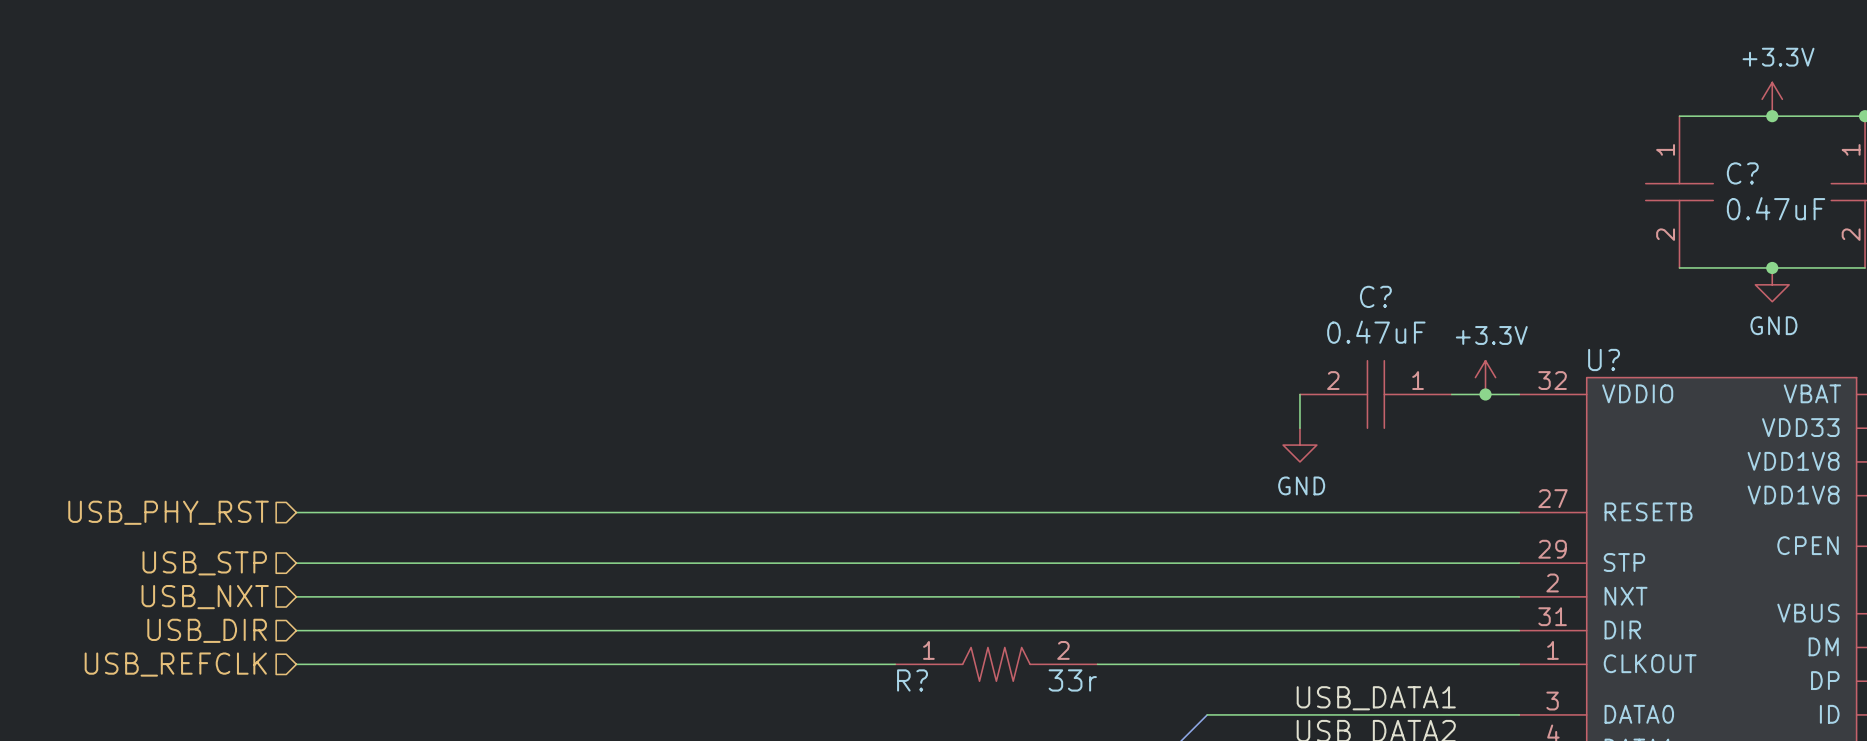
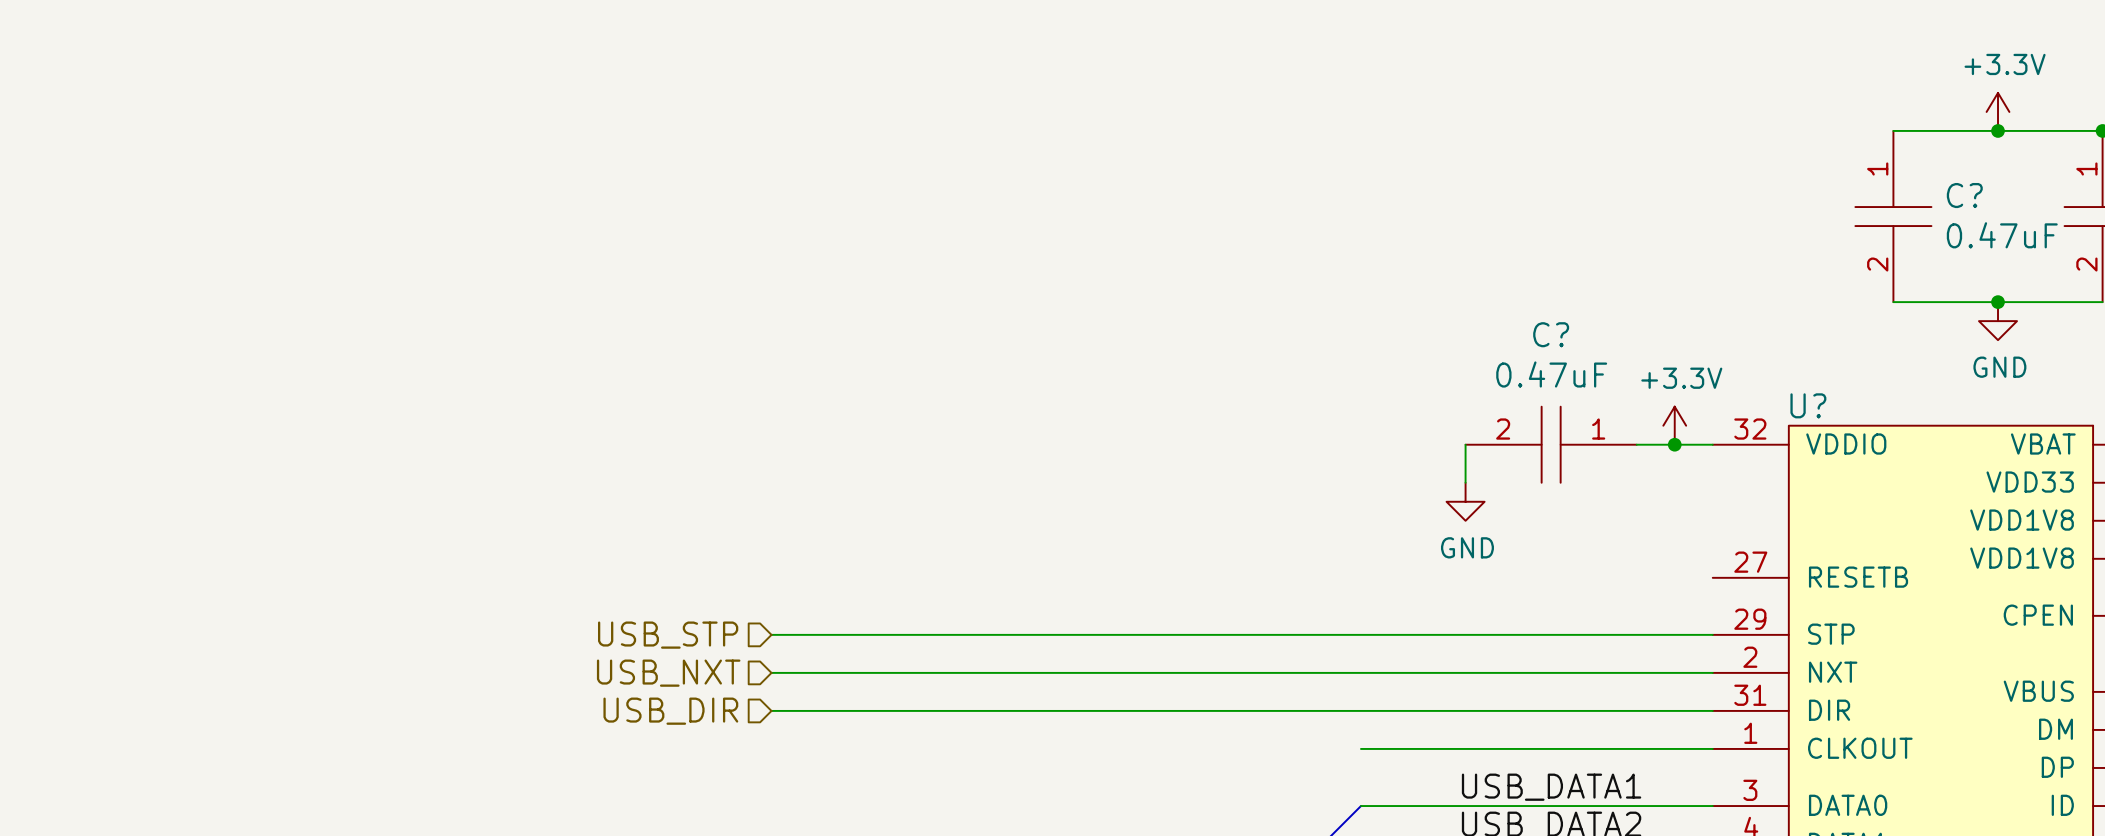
hierarchical label: USB_PHY_RST (168, 512) -> none
wire: (296, 512) (1519, 512) -> none
hierarchical label: USB_STP (204, 563) -> none
wire: (296, 563) (684, 563) -> none
hierarchical label: none -> USB_STP (668, 635)
wire: (296, 596) (684, 596) -> none
hierarchical label: USB_NXT (205, 597) -> none
hierarchical label: none -> USB_NXT (668, 673)
hierarchical label: USB_DIR (207, 630) -> none
wire: (296, 630) (684, 630) -> none
hierarchical label: none -> USB_DIR (670, 711)
hierarchical label: USB_REFCLK (175, 664) -> none
wire: (296, 664) (895, 664) -> none
R?: (996, 664) -> none
wire: (1097, 664) (1207, 664) -> none

